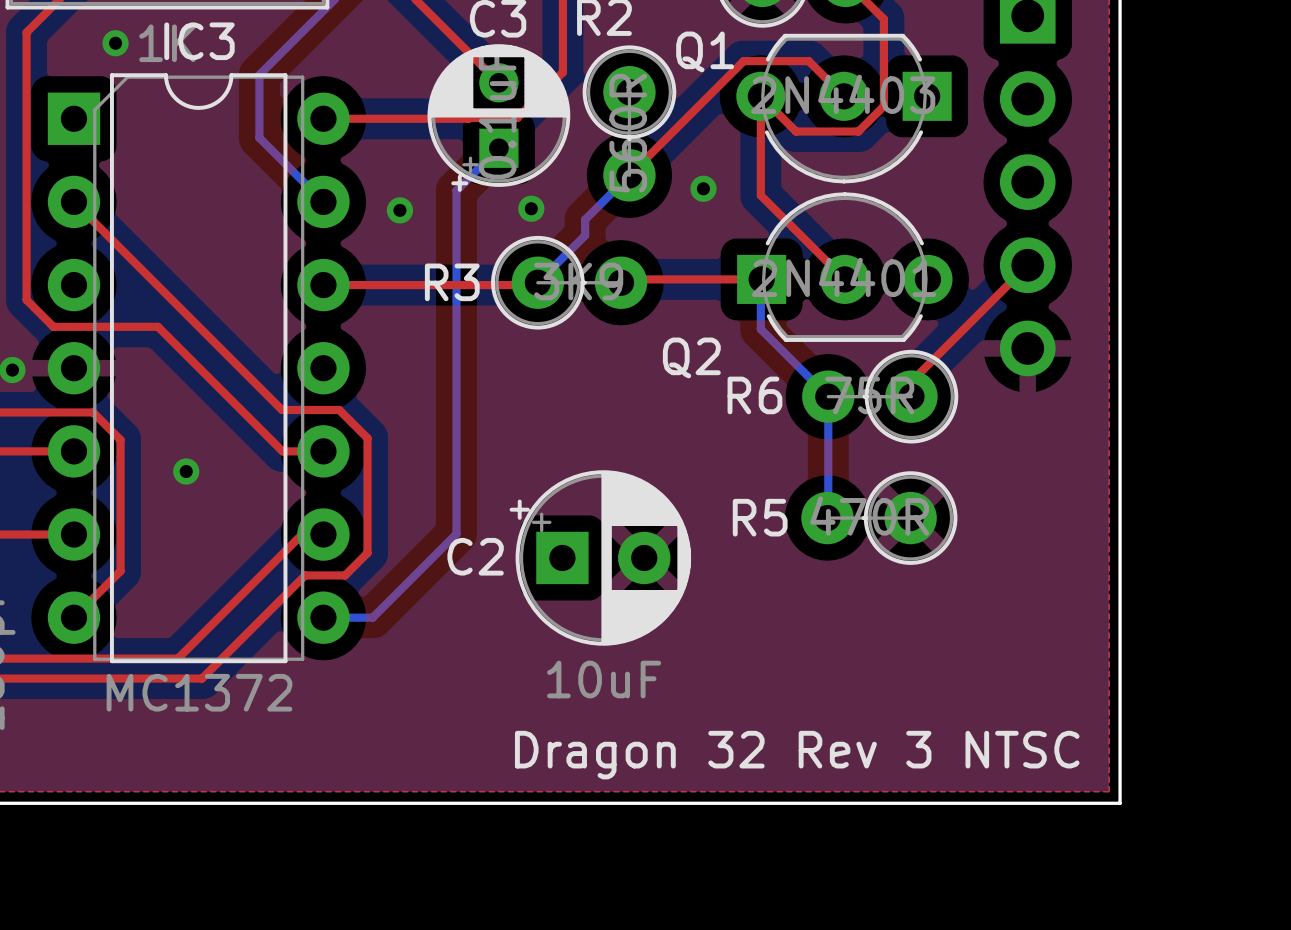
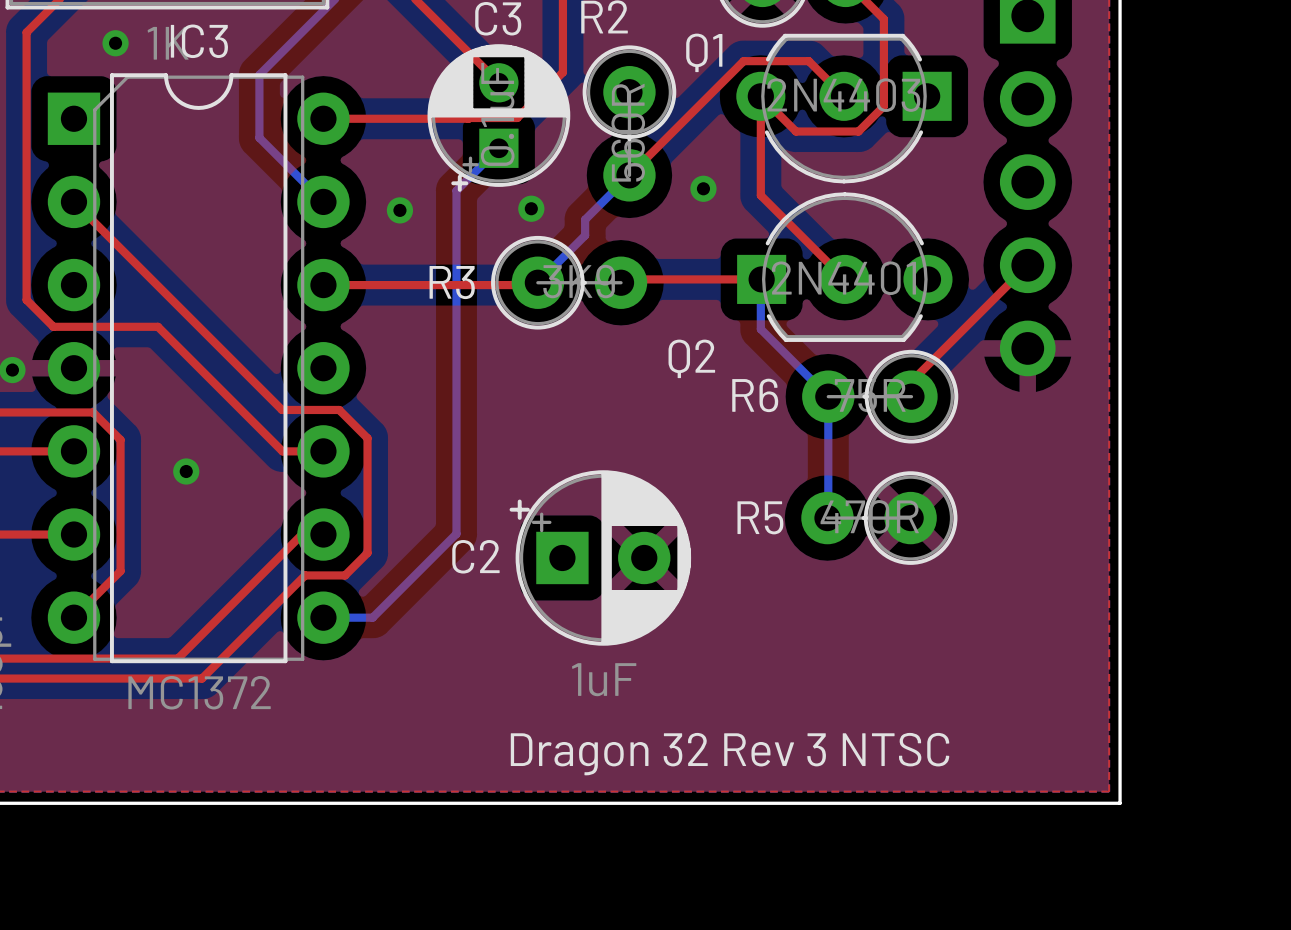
C2 value: 10uF (604, 679) -> 1uF (604, 679)

